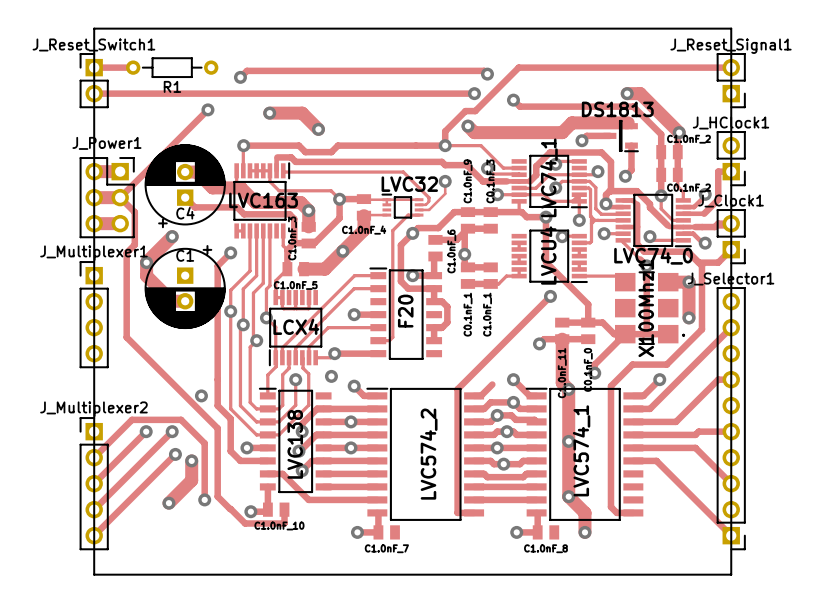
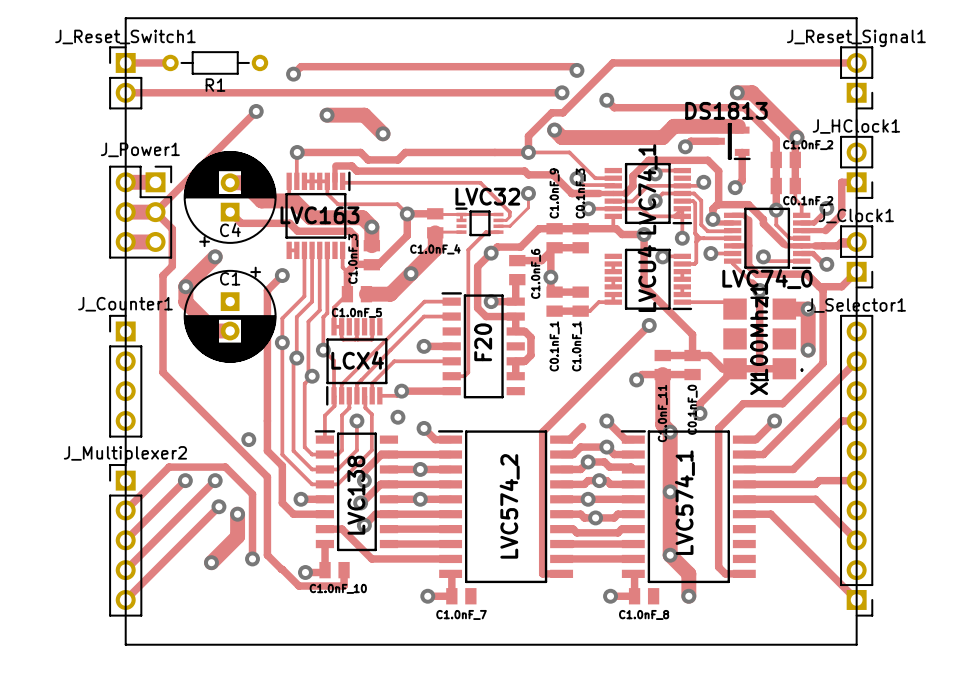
J_Multiplexer1: (94, 314) -> none
J_Counter1: none -> (125, 376)

